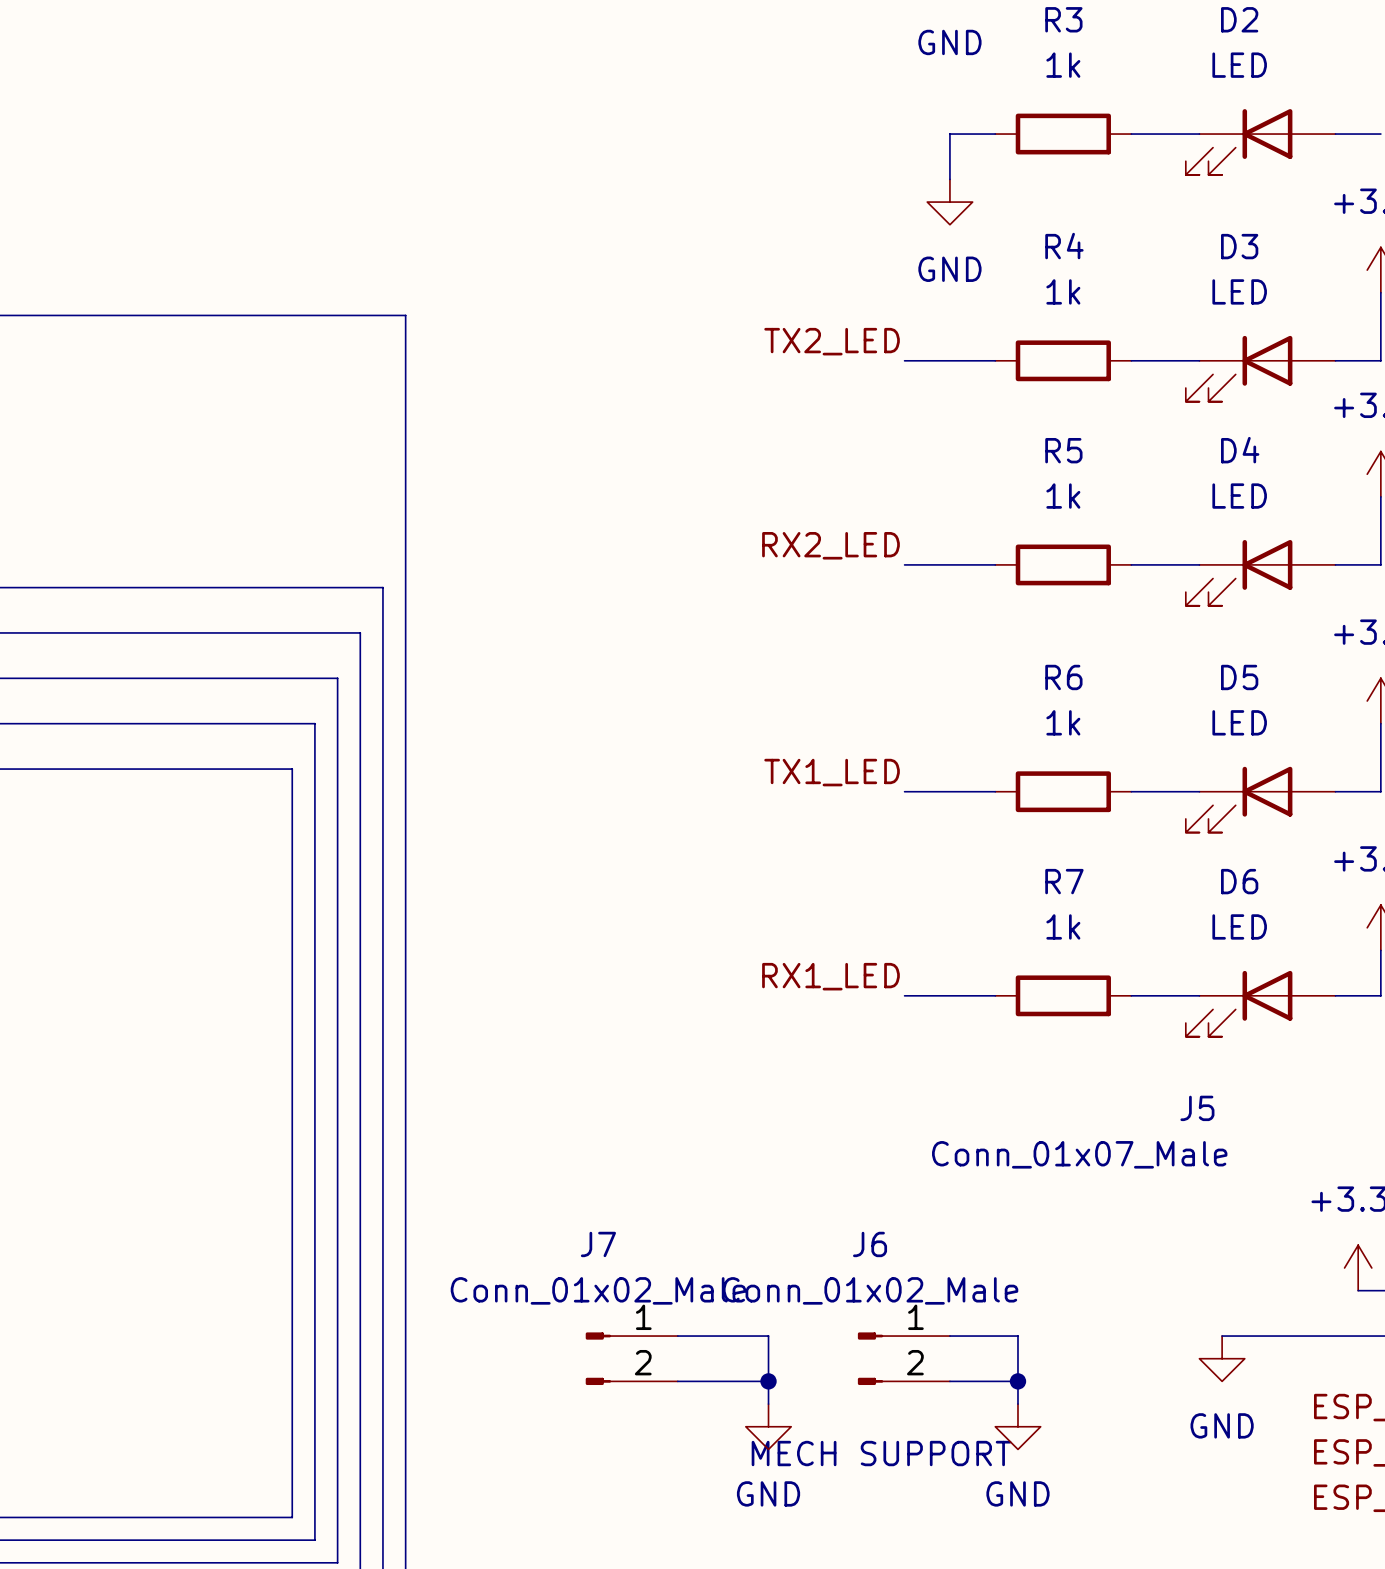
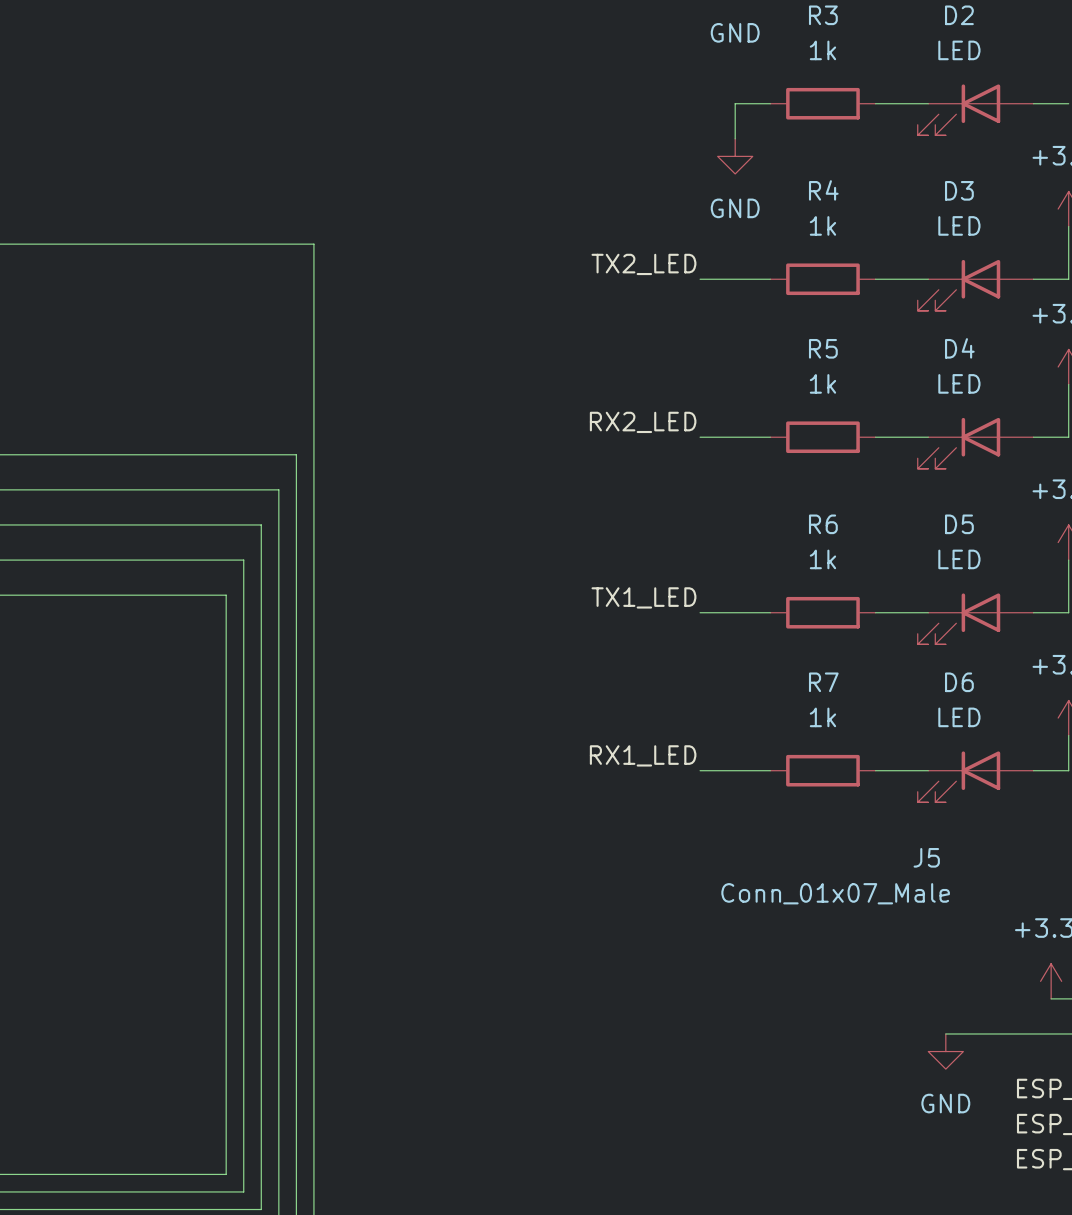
wire: (677, 1336) (768, 1336) (768, 1404) -> none
wire: (949, 1336) (1017, 1336) (1017, 1404) -> none
J7: Conn_01x02_Male (631, 1358) -> none
J6: Conn_01x02_Male (903, 1358) -> none
wire: (677, 1381) (768, 1381) -> none
junction: (768, 1381) -> none
wire: (949, 1381) (1017, 1381) -> none
junction: (1017, 1381) -> none
power symbol: GND (768, 1426) -> none
power symbol: GND (1017, 1426) -> none
text: MECH SUPPORT (881, 1453) -> none

